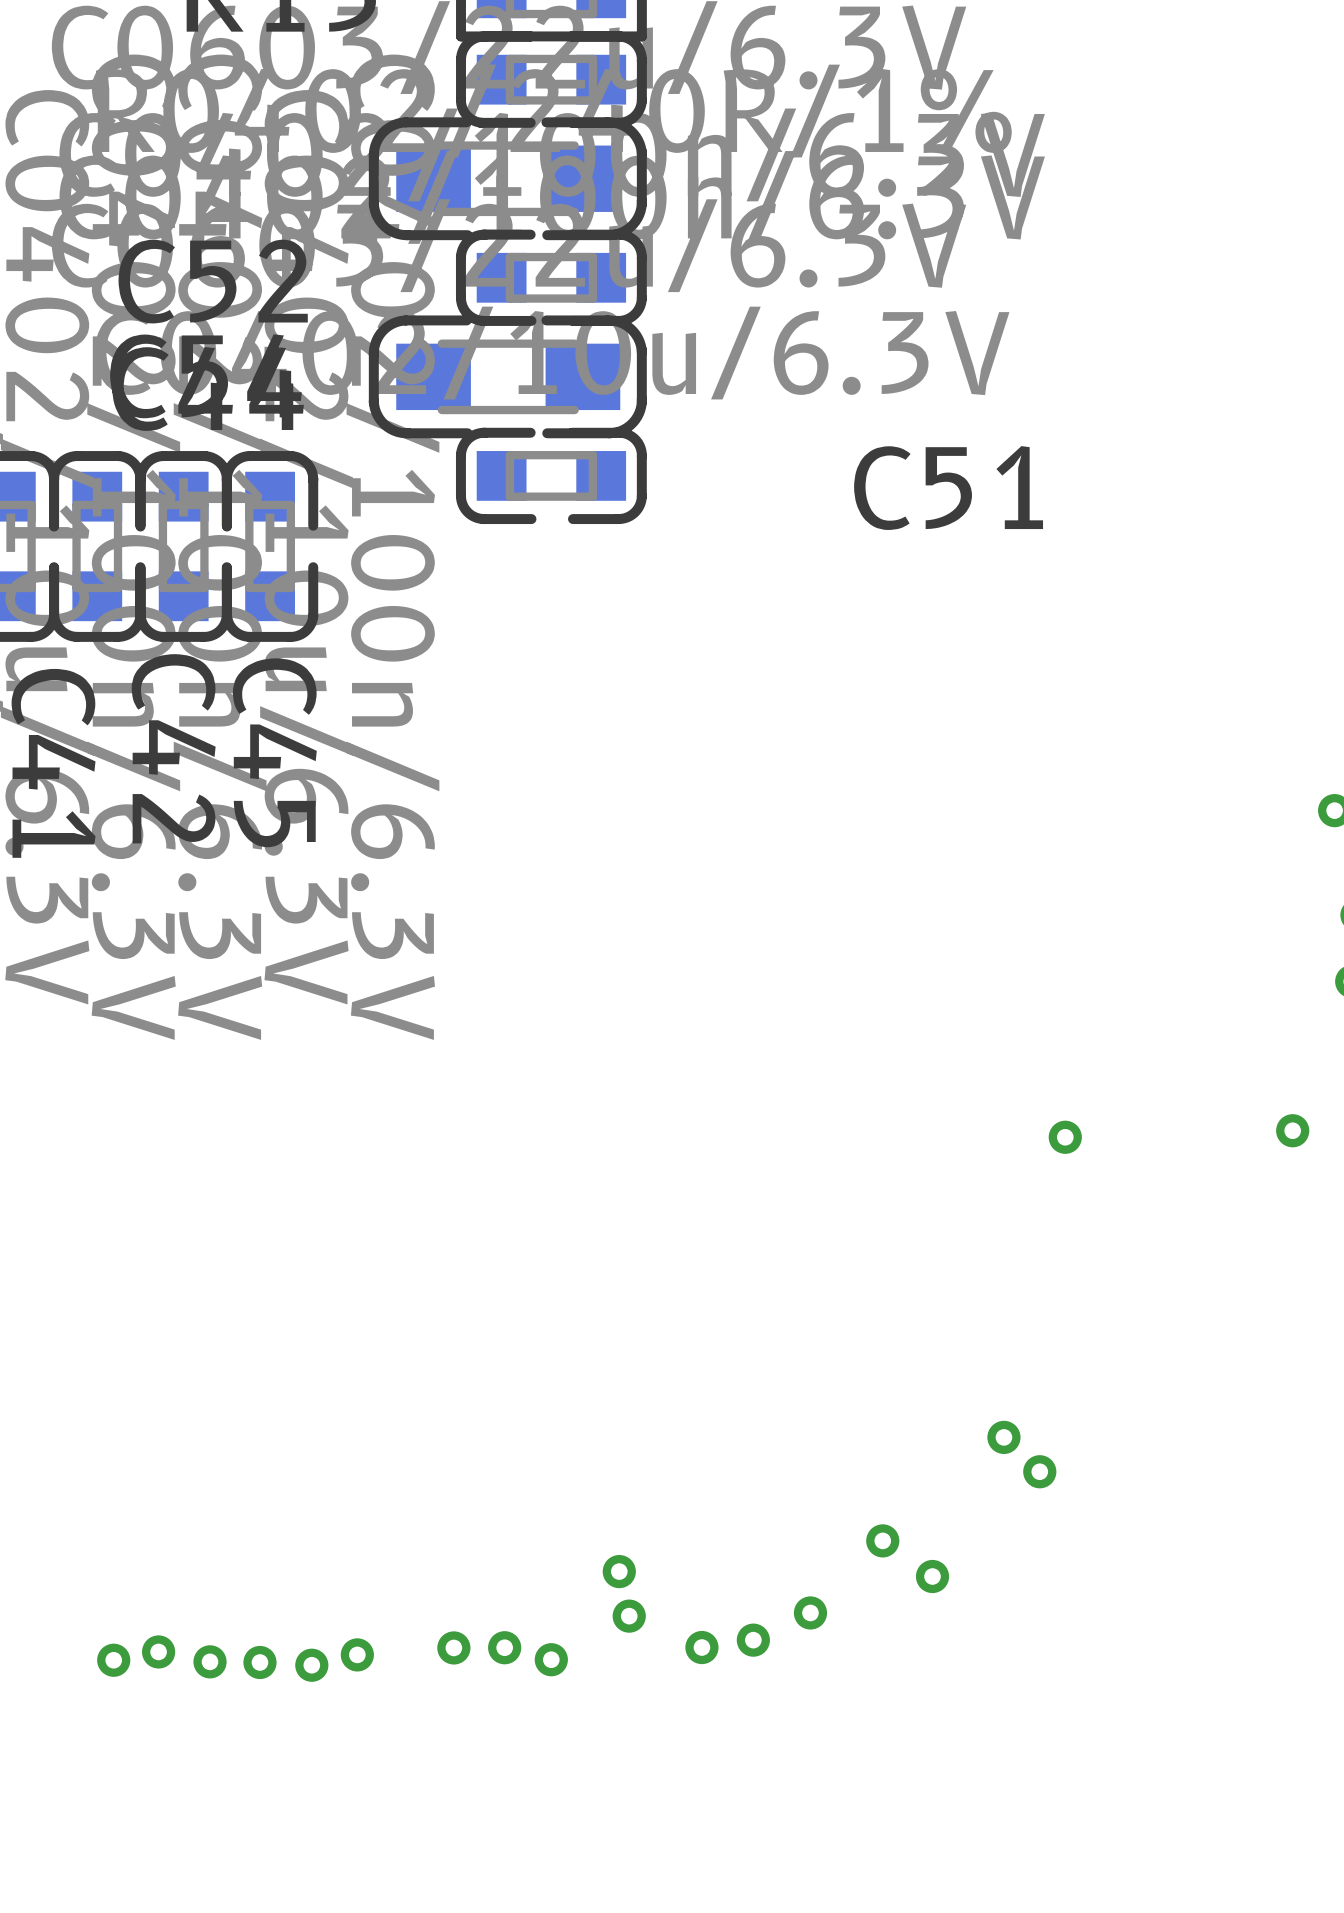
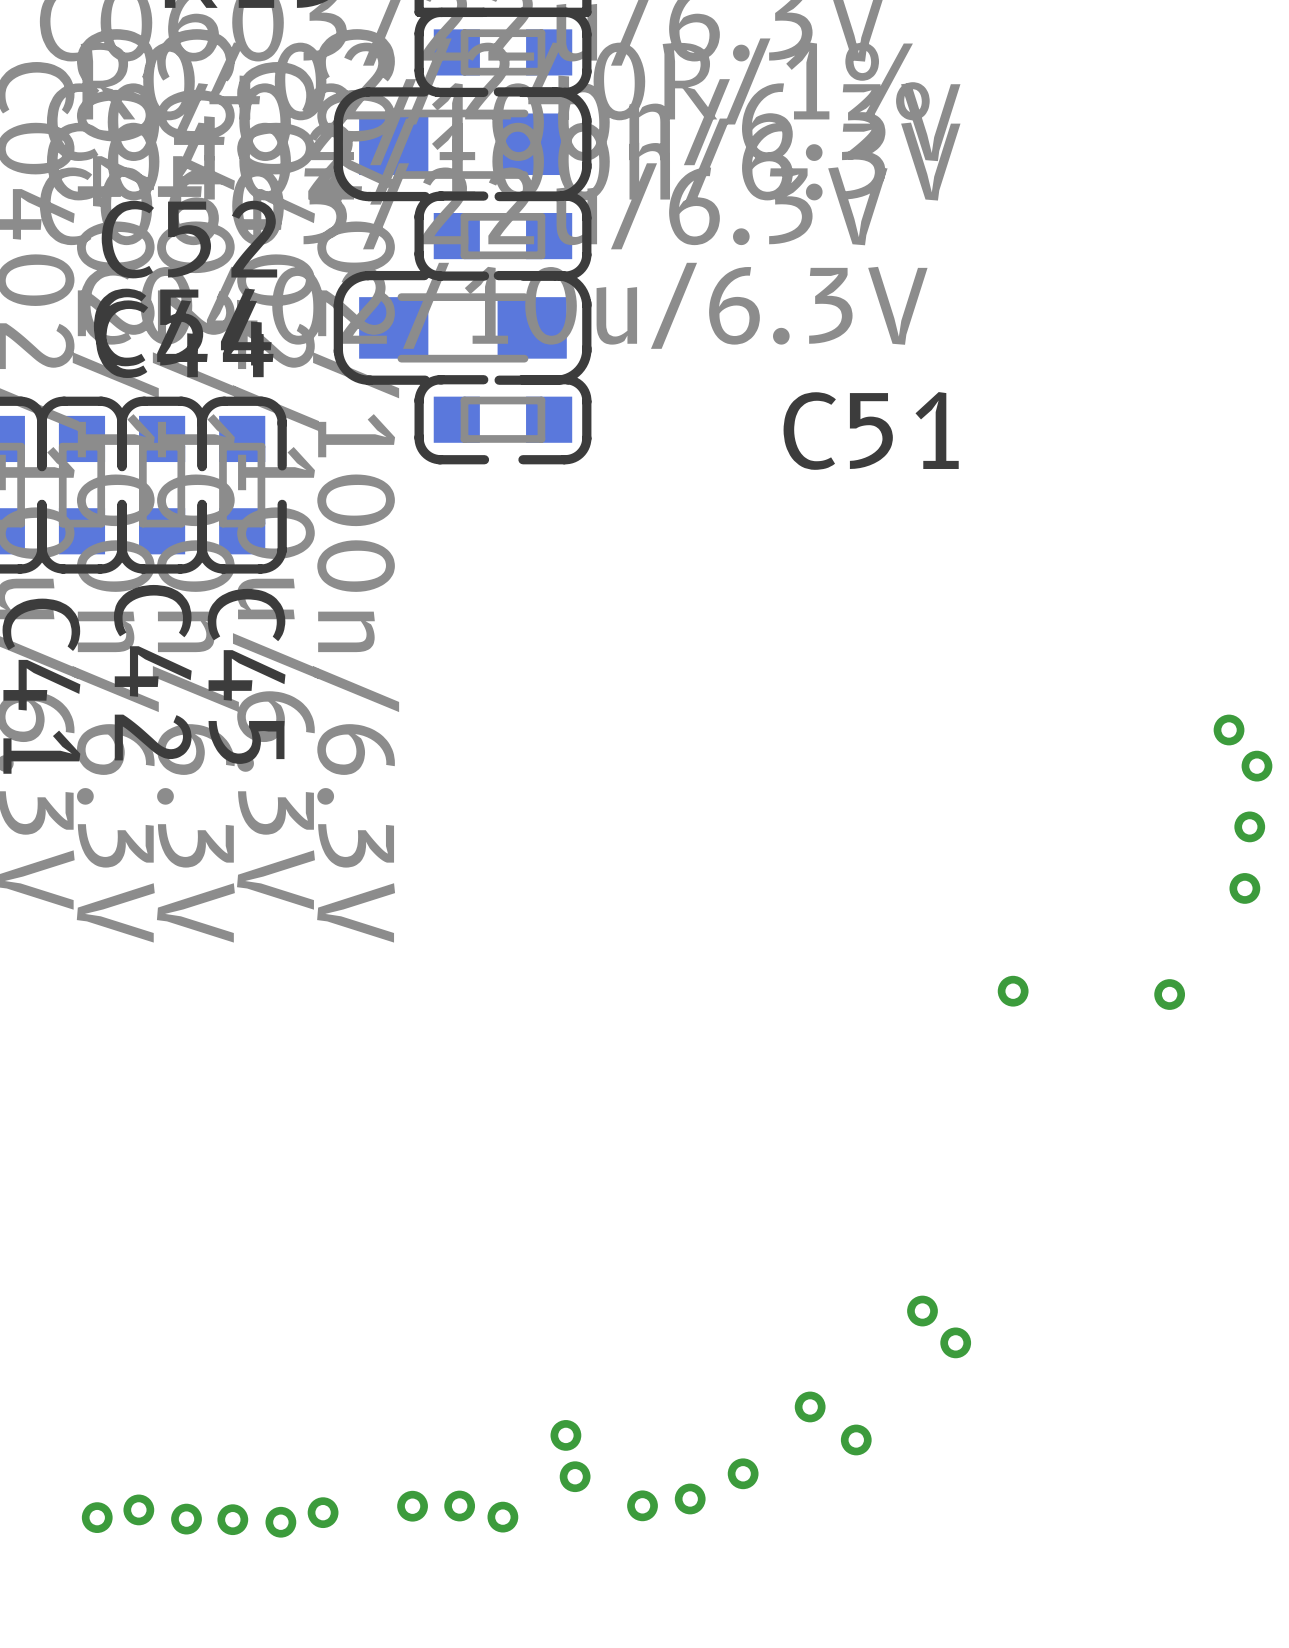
via position: (1292, 1130) -> (1169, 994)
via position: (1065, 1137) -> (1013, 991)

